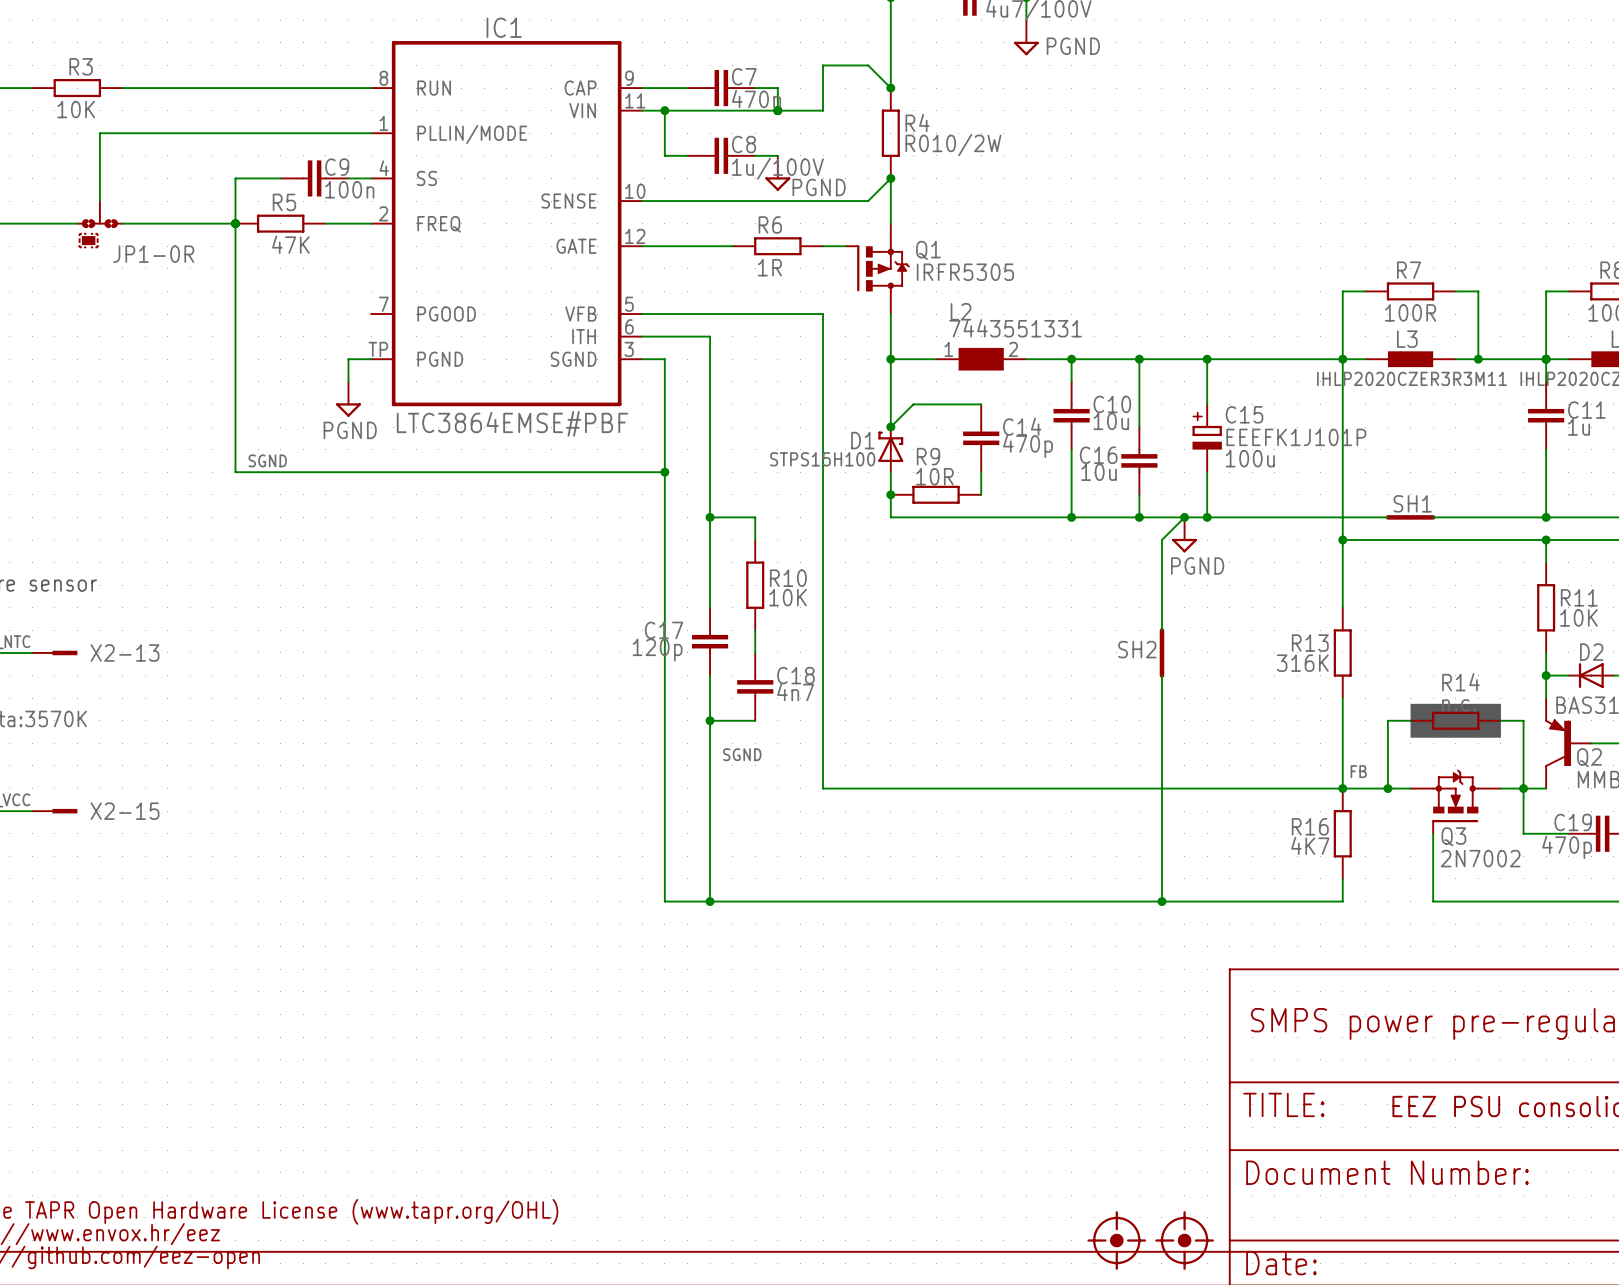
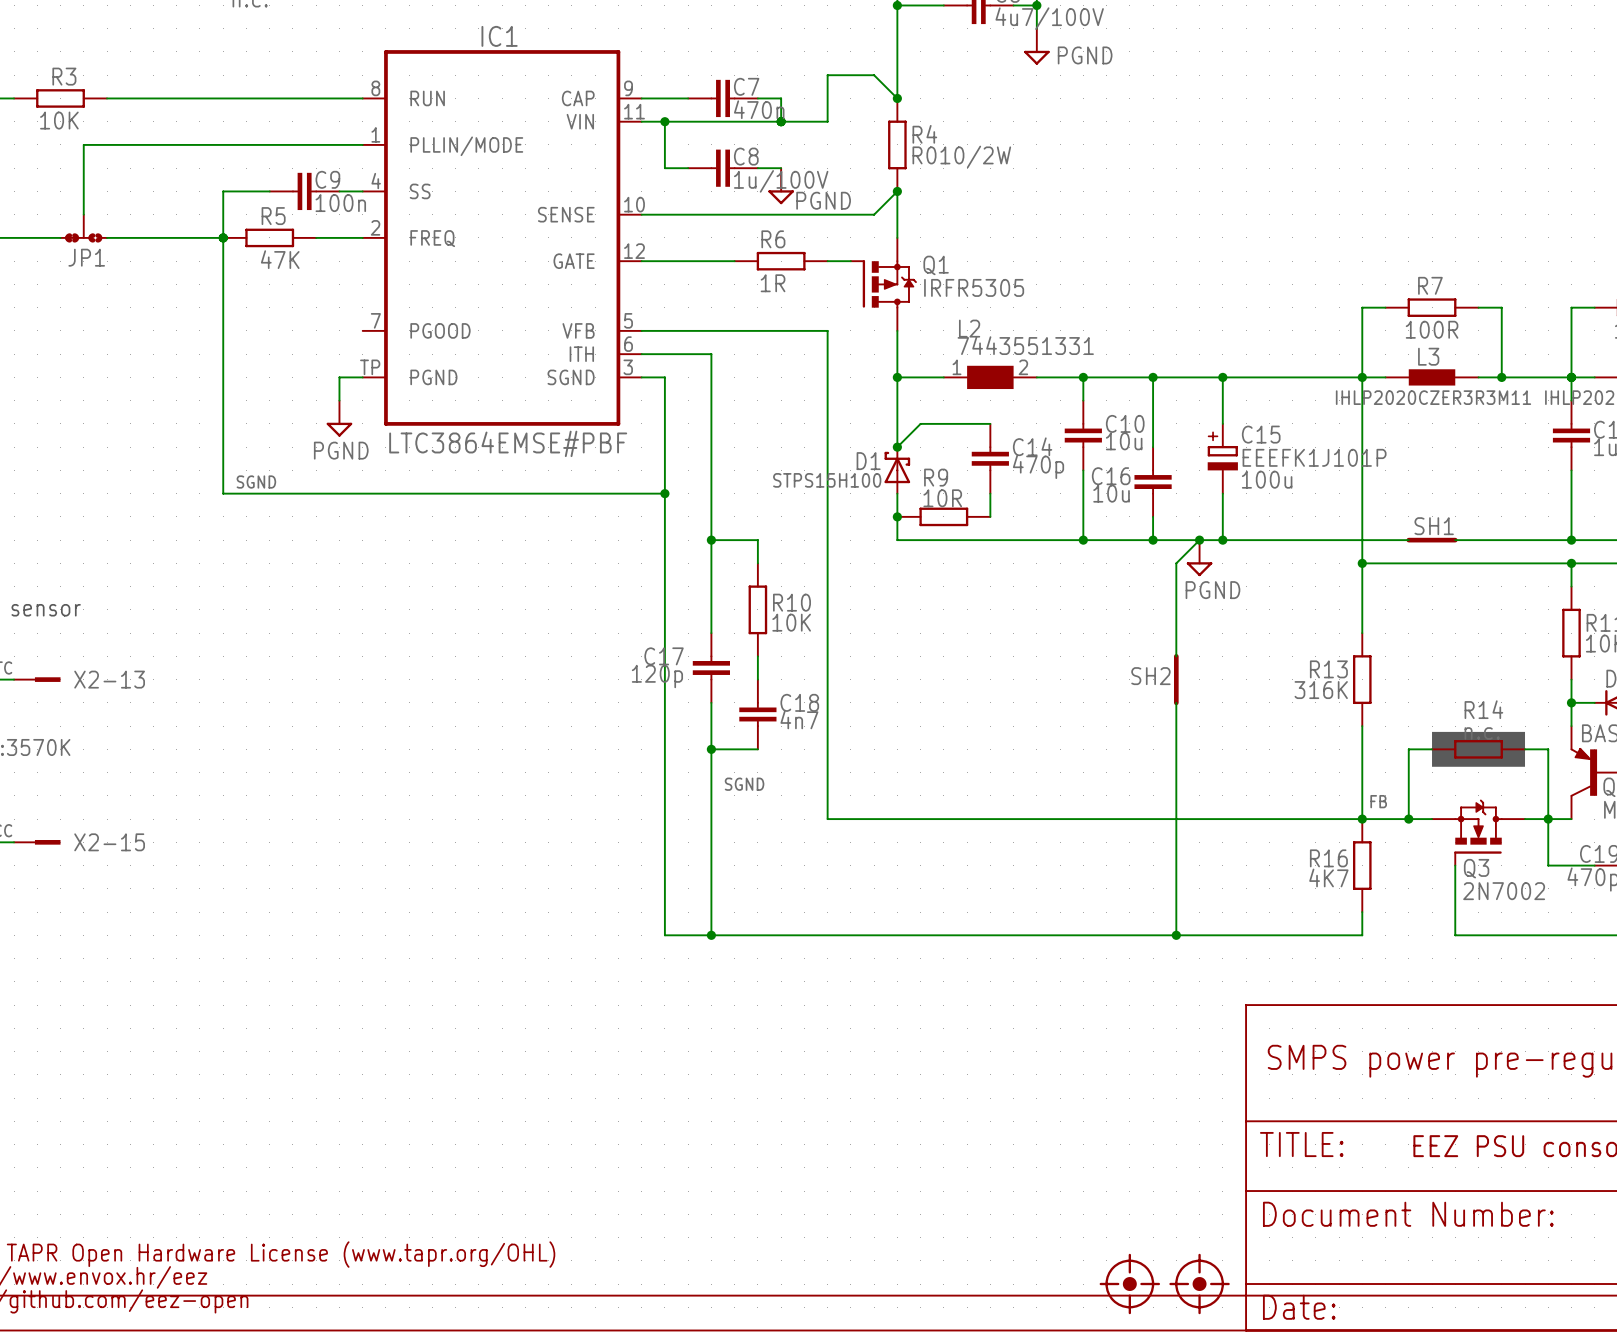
JP1-0R: (99, 214) -> none
JP1: none -> (83, 228)
part: (88, 240) -> none

